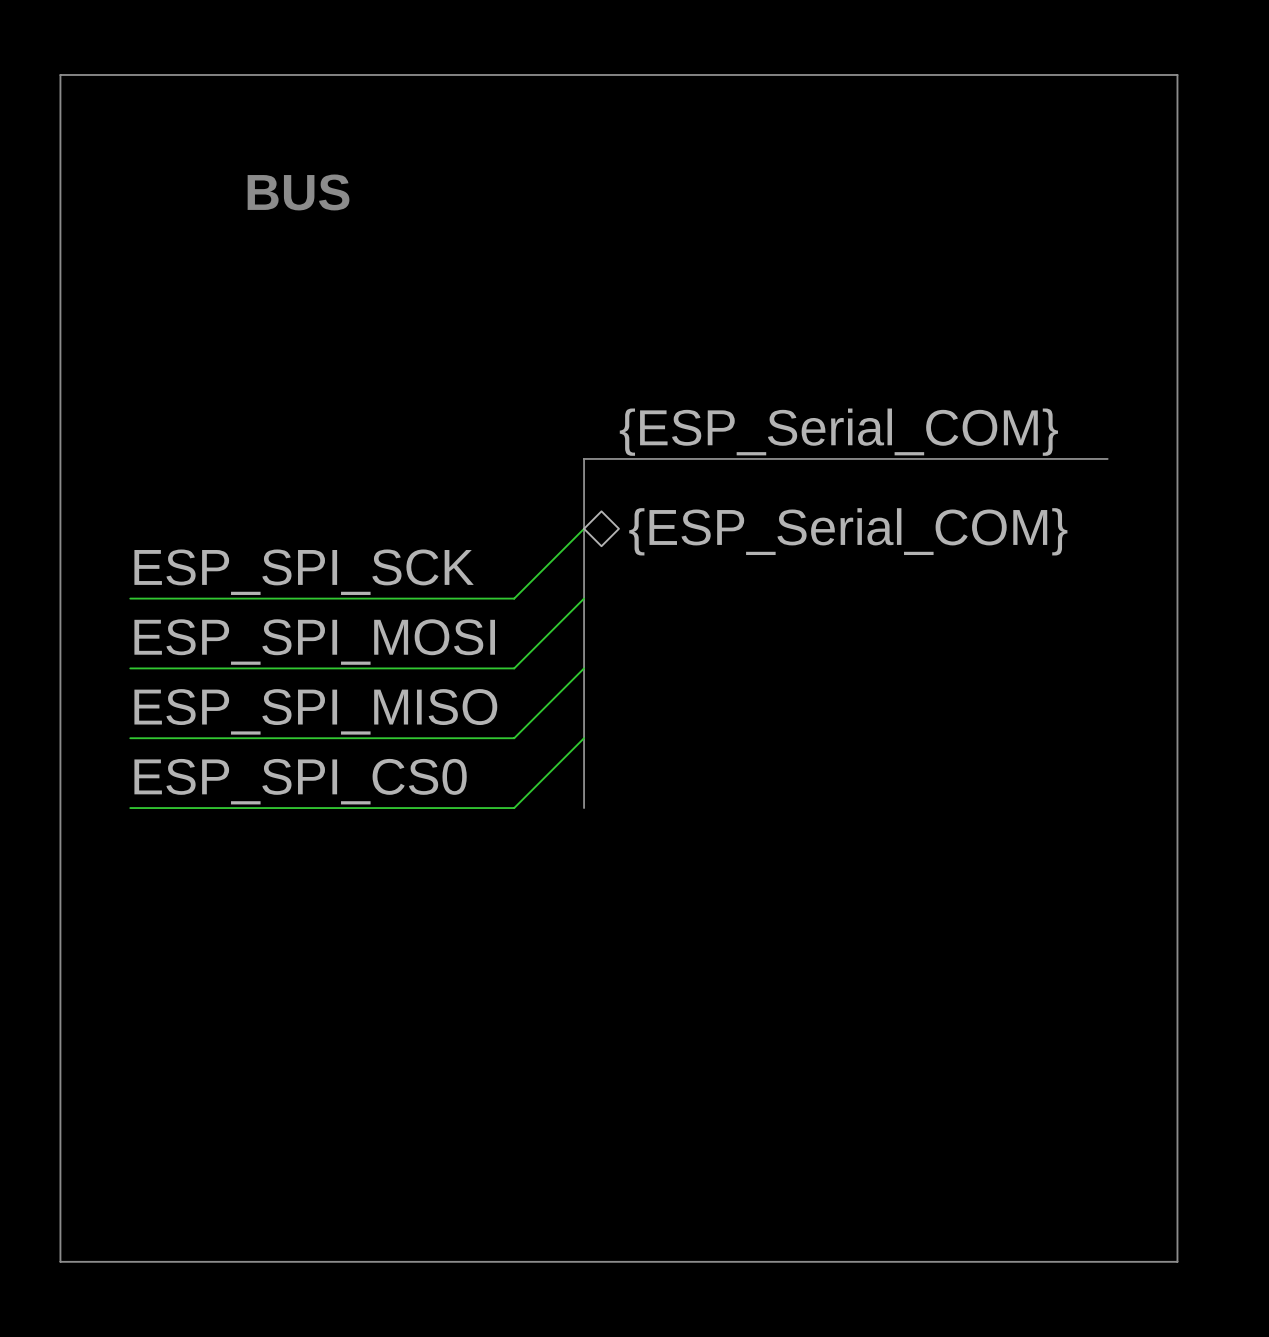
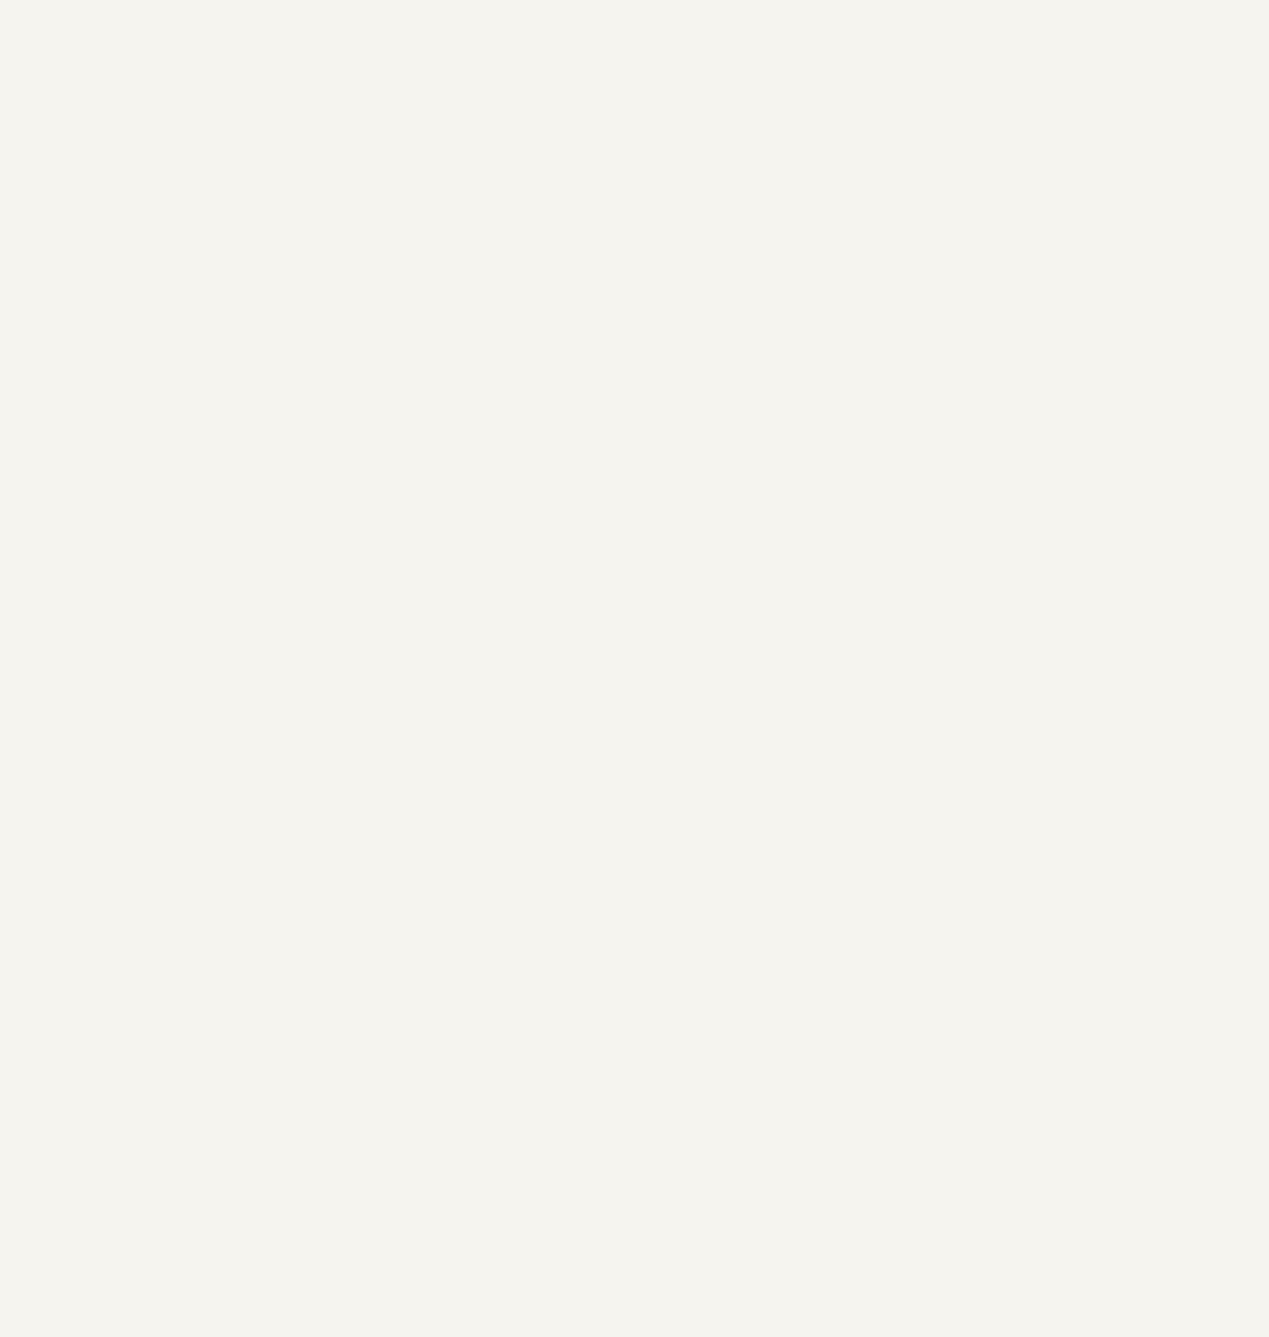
line: (60, 74) (1177, 74) (1177, 1261) (60, 1261) (60, 74) -> none
text: BUS (298, 192) -> none
label: {ESP_Serial_COM} (838, 432) -> none
bus: (1107, 458) (584, 458) (584, 808) -> none
wire: (584, 528) (514, 598) (130, 598) -> none
hierarchical label: {ESP_Serial_COM} (848, 531) -> none
label: ESP_SPI_SCK (304, 572) -> none
wire: (584, 598) (514, 668) (130, 668) -> none
label: ESP_SPI_MOSI (314, 642) -> none
wire: (584, 668) (514, 738) (130, 738) -> none
label: ESP_SPI_MISO (315, 711) -> none
wire: (584, 738) (514, 808) (130, 808) -> none
label: ESP_SPI_CS0 (300, 781) -> none

